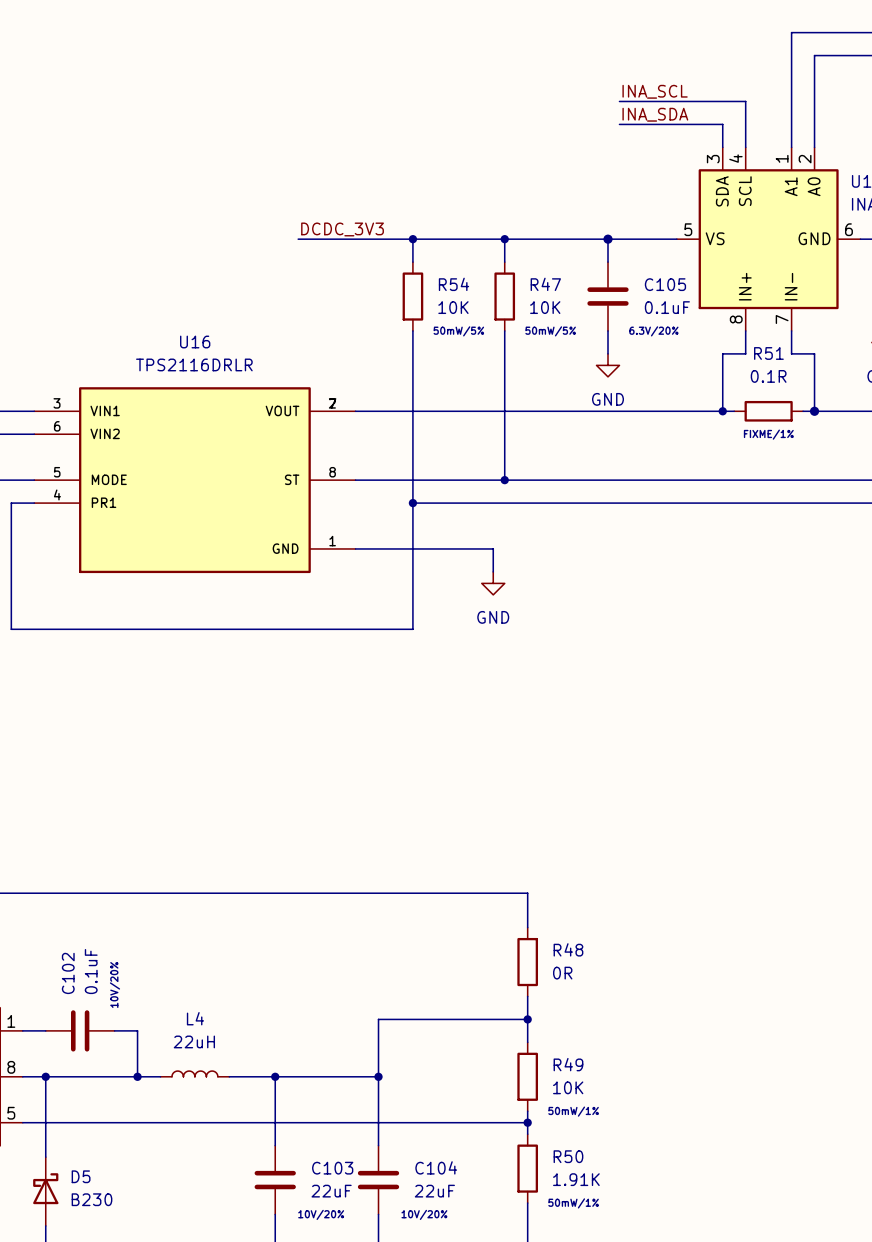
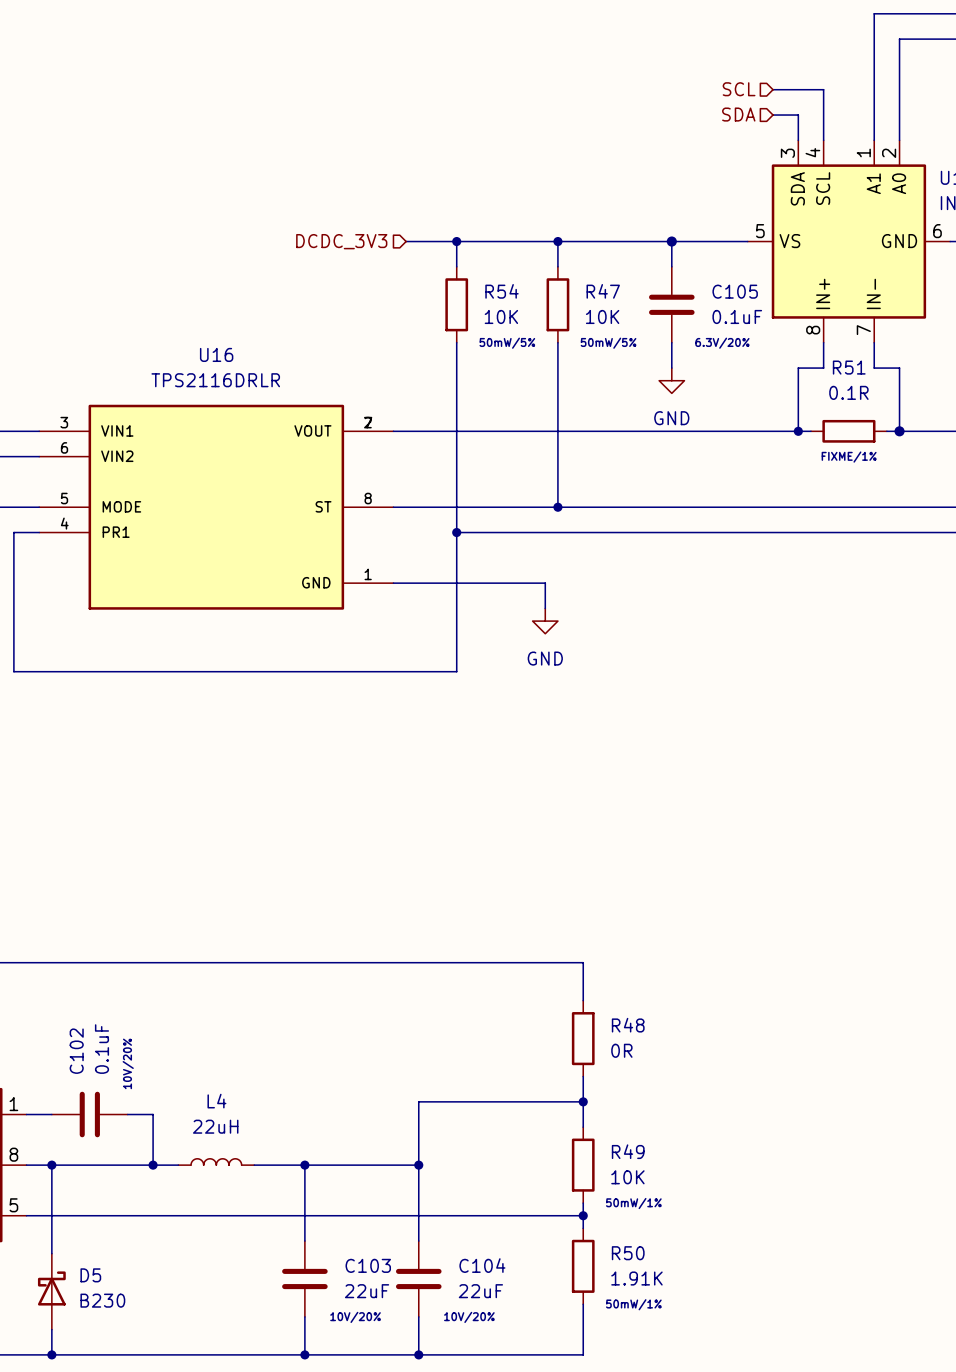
label: INA_SCL (655, 91) -> none
wire: (619, 101) (699, 101) -> none
hierarchical label: none -> SCL (739, 89)
label: INA_SDA (655, 114) -> none
hierarchical label: none -> SDA (738, 114)
wire: (619, 124) (699, 124) -> none
label: DCDC_3V3 (342, 229) -> none
wire: (298, 239) (367, 239) -> none
hierarchical label: none -> DCDC_3V3 (341, 241)

